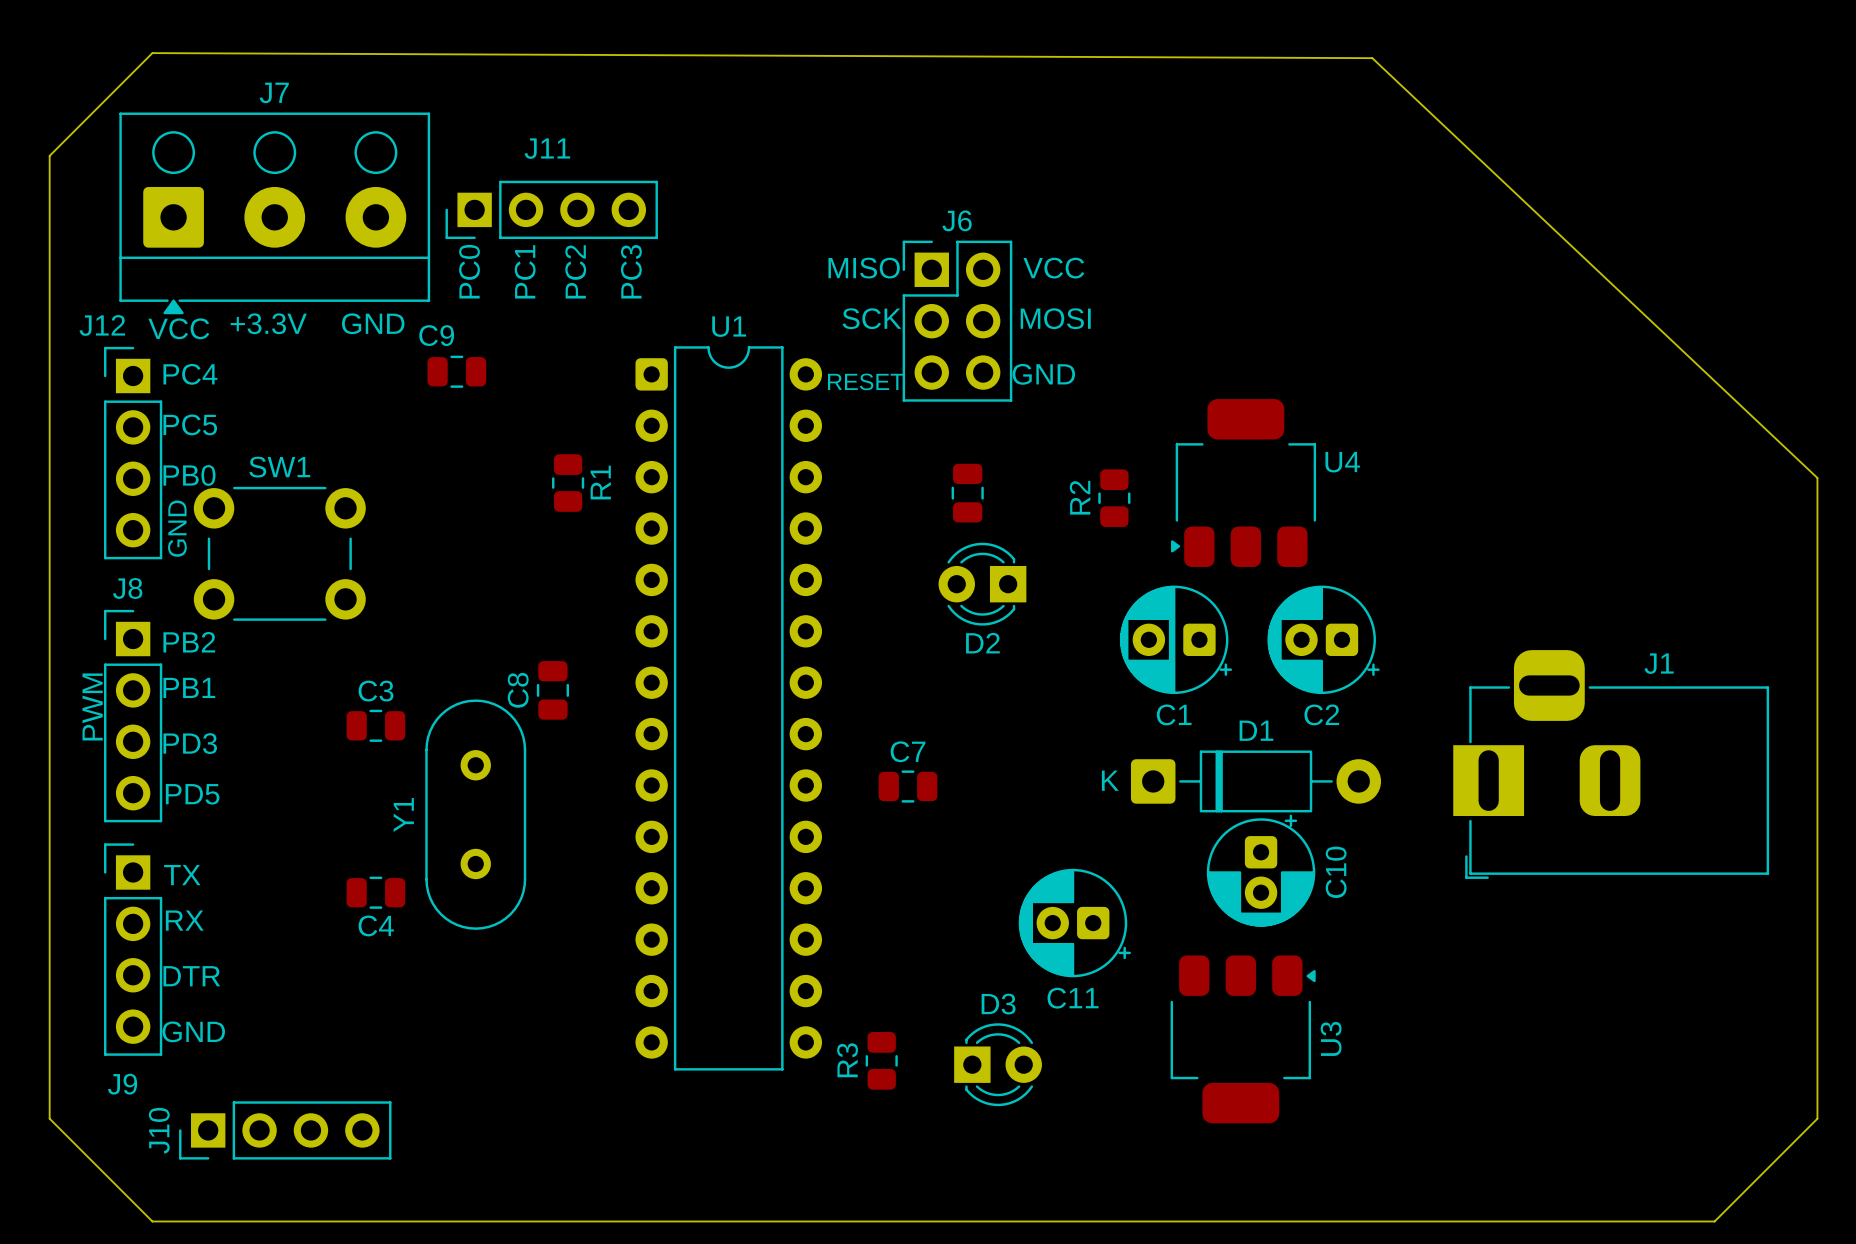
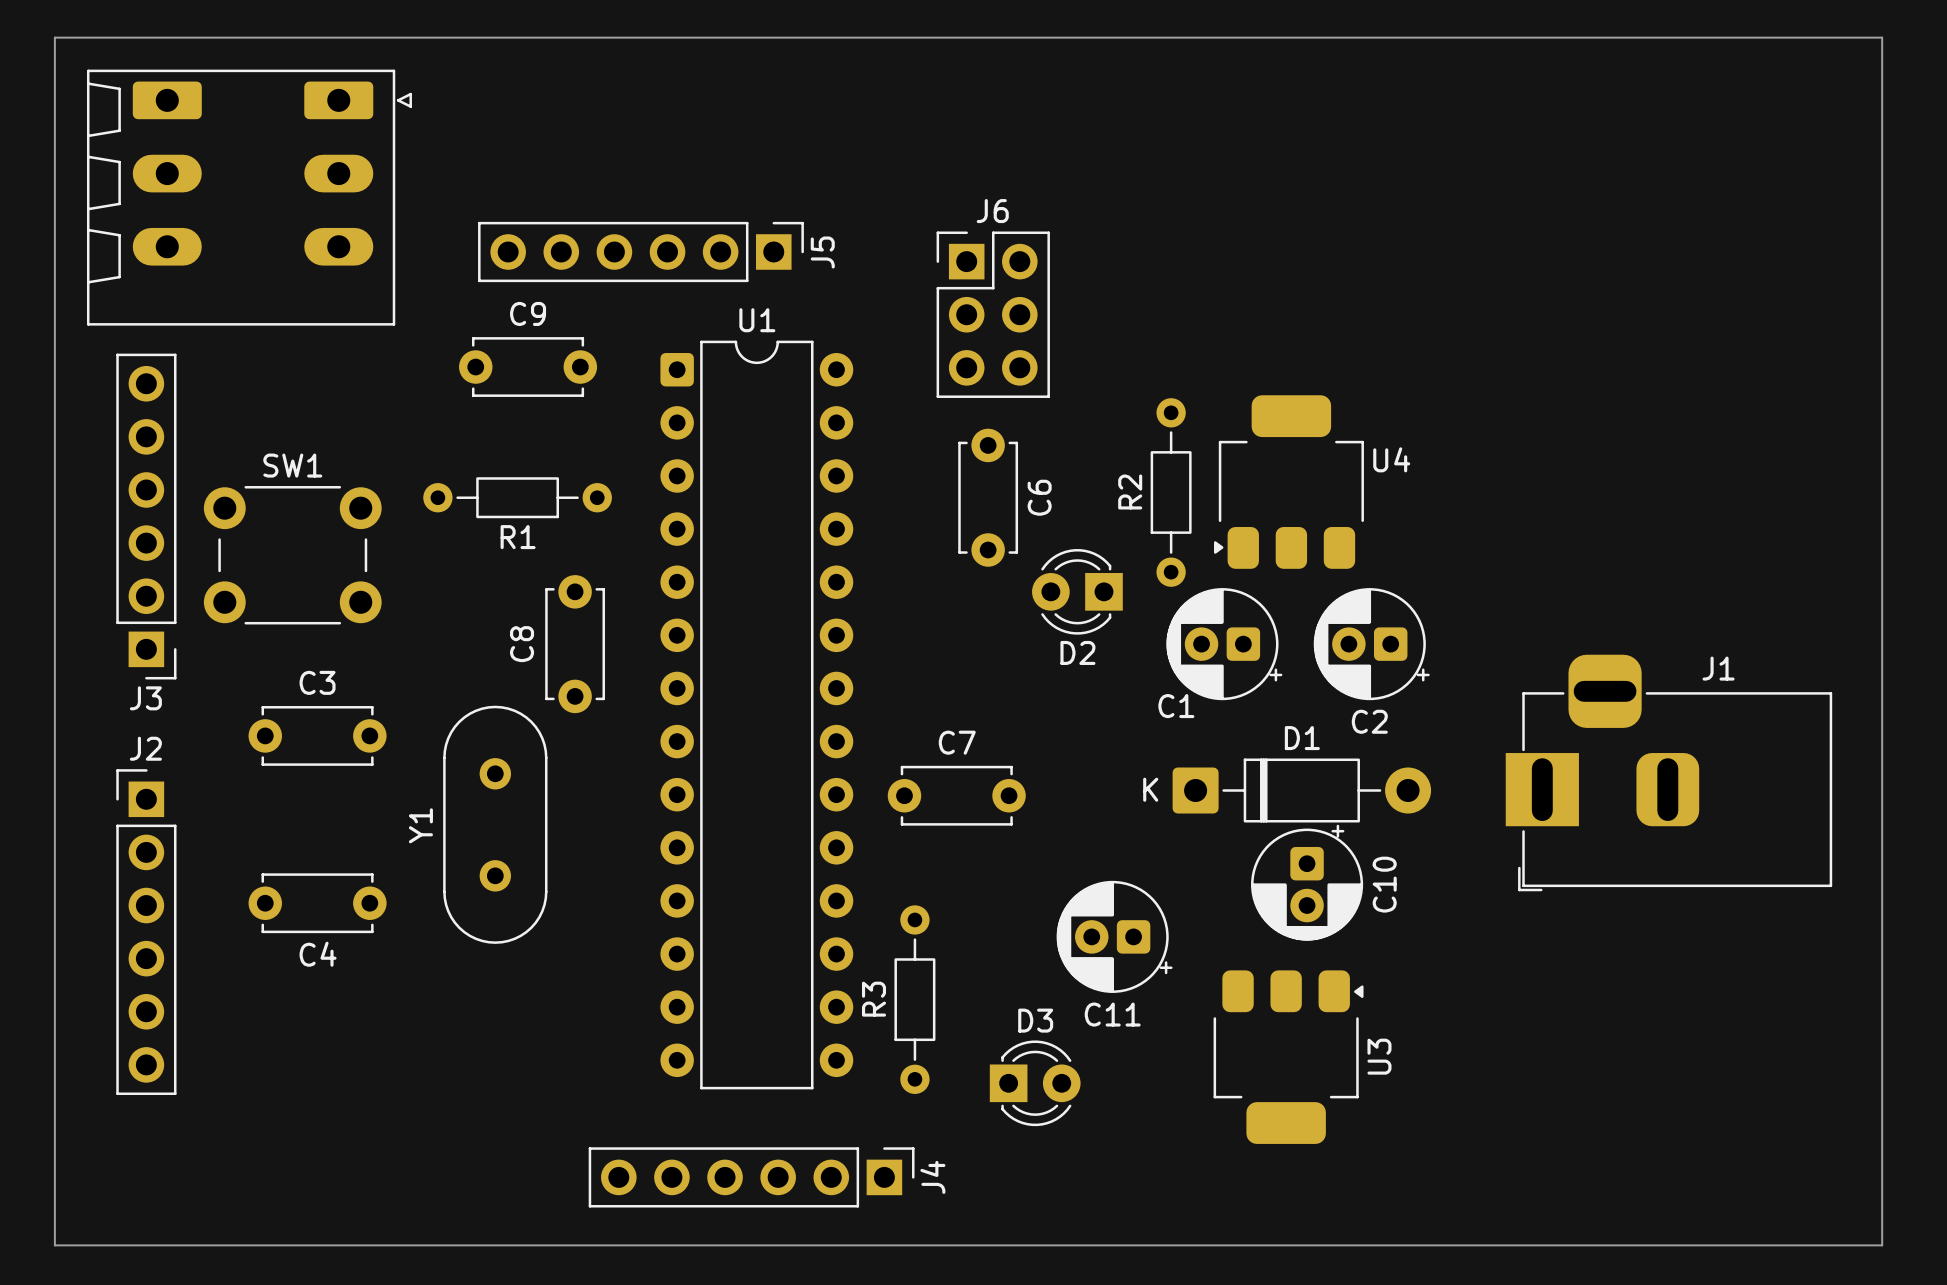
board edge: (49, 155) (152, 53) (1372, 58) (1817, 477) -> (54, 143) (54, 37) (1882, 37) (1882, 476)
part: none -> (249, 197)
J11: (551, 209) -> none
J7: (274, 213) -> none
J5: none -> (640, 251)
text: MISO (864, 268) -> none
text: VCC (1053, 268) -> none
text: PC0 (469, 271) -> none
text: PC1 (525, 271) -> none
text: PC2 (575, 271) -> none
text: PC3 (631, 271) -> none
text: SCK (871, 318) -> none
text: MOSI (1055, 318) -> none
text: +3.3V (268, 323) -> none
text: GND (373, 323) -> none
text: VCC (178, 328) -> none
C9 footprint: [427, 355, 487, 388] -> [459, 337, 598, 397]
text: PC4 (190, 374) -> none
text: GND (1043, 374) -> none
text: RESET (865, 381) -> none
text: PC5 (190, 424) -> none
J12: (133, 453) -> none
R1 footprint: [552, 454, 585, 512] -> [423, 477, 612, 519]
R2 footprint: [1098, 469, 1131, 528] -> [1150, 398, 1192, 587]
text: PB0 (189, 475) -> none
R1 name position: R1 (600, 482) -> R1 (518, 537)
part: (967, 493) -> none
C6: none -> (988, 497)
J3: none -> (146, 516)
text: GND (177, 528) -> none
D2 position: (982, 584) -> (1077, 591)
C1 footprint: [1119, 585, 1233, 695] -> [1166, 588, 1283, 701]
text: PB2 (189, 642) -> none
C8 footprint: [536, 661, 570, 720] -> [545, 575, 606, 714]
text: PB1 (189, 687) -> none
text: PWM (92, 706) -> none
C3 footprint: [346, 709, 406, 742] -> [248, 706, 387, 766]
C1 name position: C1 (1174, 714) -> C1 (1176, 706)
J8: (133, 716) -> none
text: PD3 (190, 743) -> none
C7 footprint: [878, 770, 938, 803] -> [887, 765, 1026, 826]
text: PD5 (192, 794) -> none
text: TX (182, 875) -> none
C4 footprint: [346, 876, 406, 909] -> [248, 873, 387, 934]
J2: none -> (146, 932)
text: RX (184, 920) -> none
J9: (133, 949) -> none
text: DTR (191, 976) -> none
text: GND (193, 1031) -> none
R3 footprint: [865, 1032, 898, 1090] -> [894, 905, 936, 1094]
board edge: (49, 1118) (152, 1221) -> (54, 1139) (54, 1245) (161, 1245)
board edge: (1817, 1118) (1714, 1221) -> (1882, 1139) (1882, 1245) (1775, 1245)
J10: (285, 1130) -> none
J4: none -> (751, 1177)

